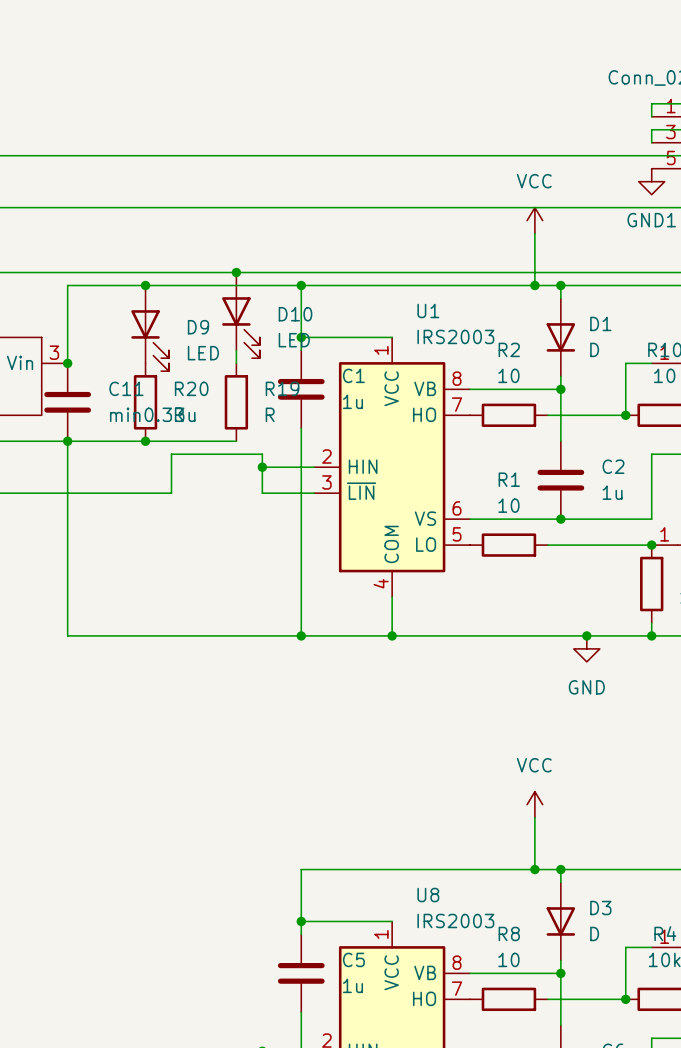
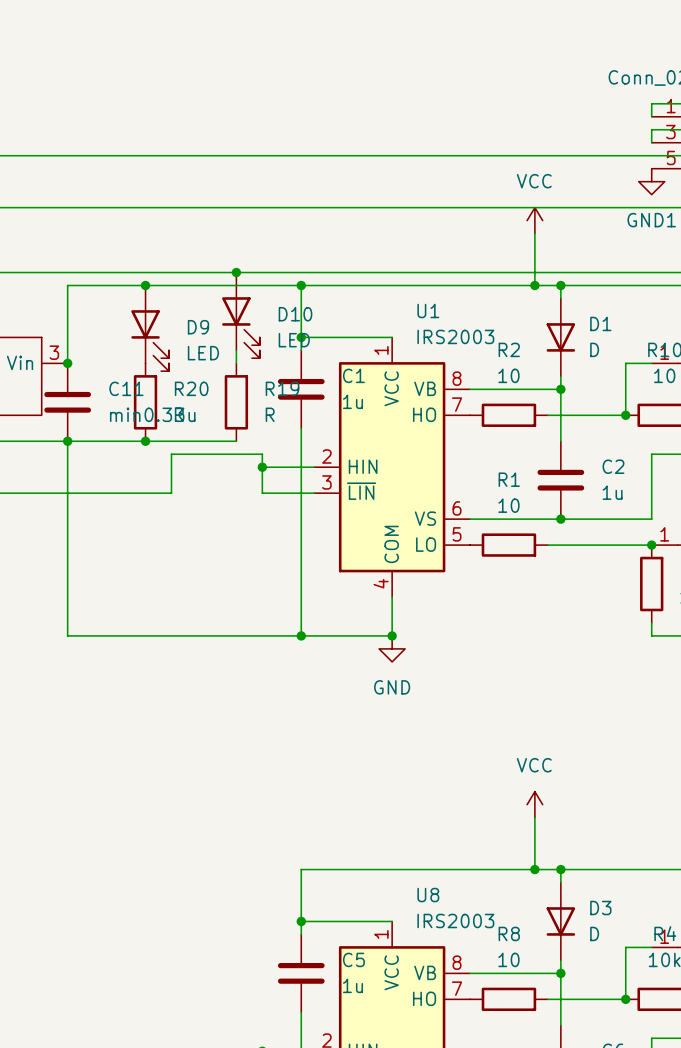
wire: (392, 635) (651, 635) -> none
junction: (586, 635) -> none
junction: (651, 635) -> none
power symbol position: GND (586, 648) -> GND (392, 648)

